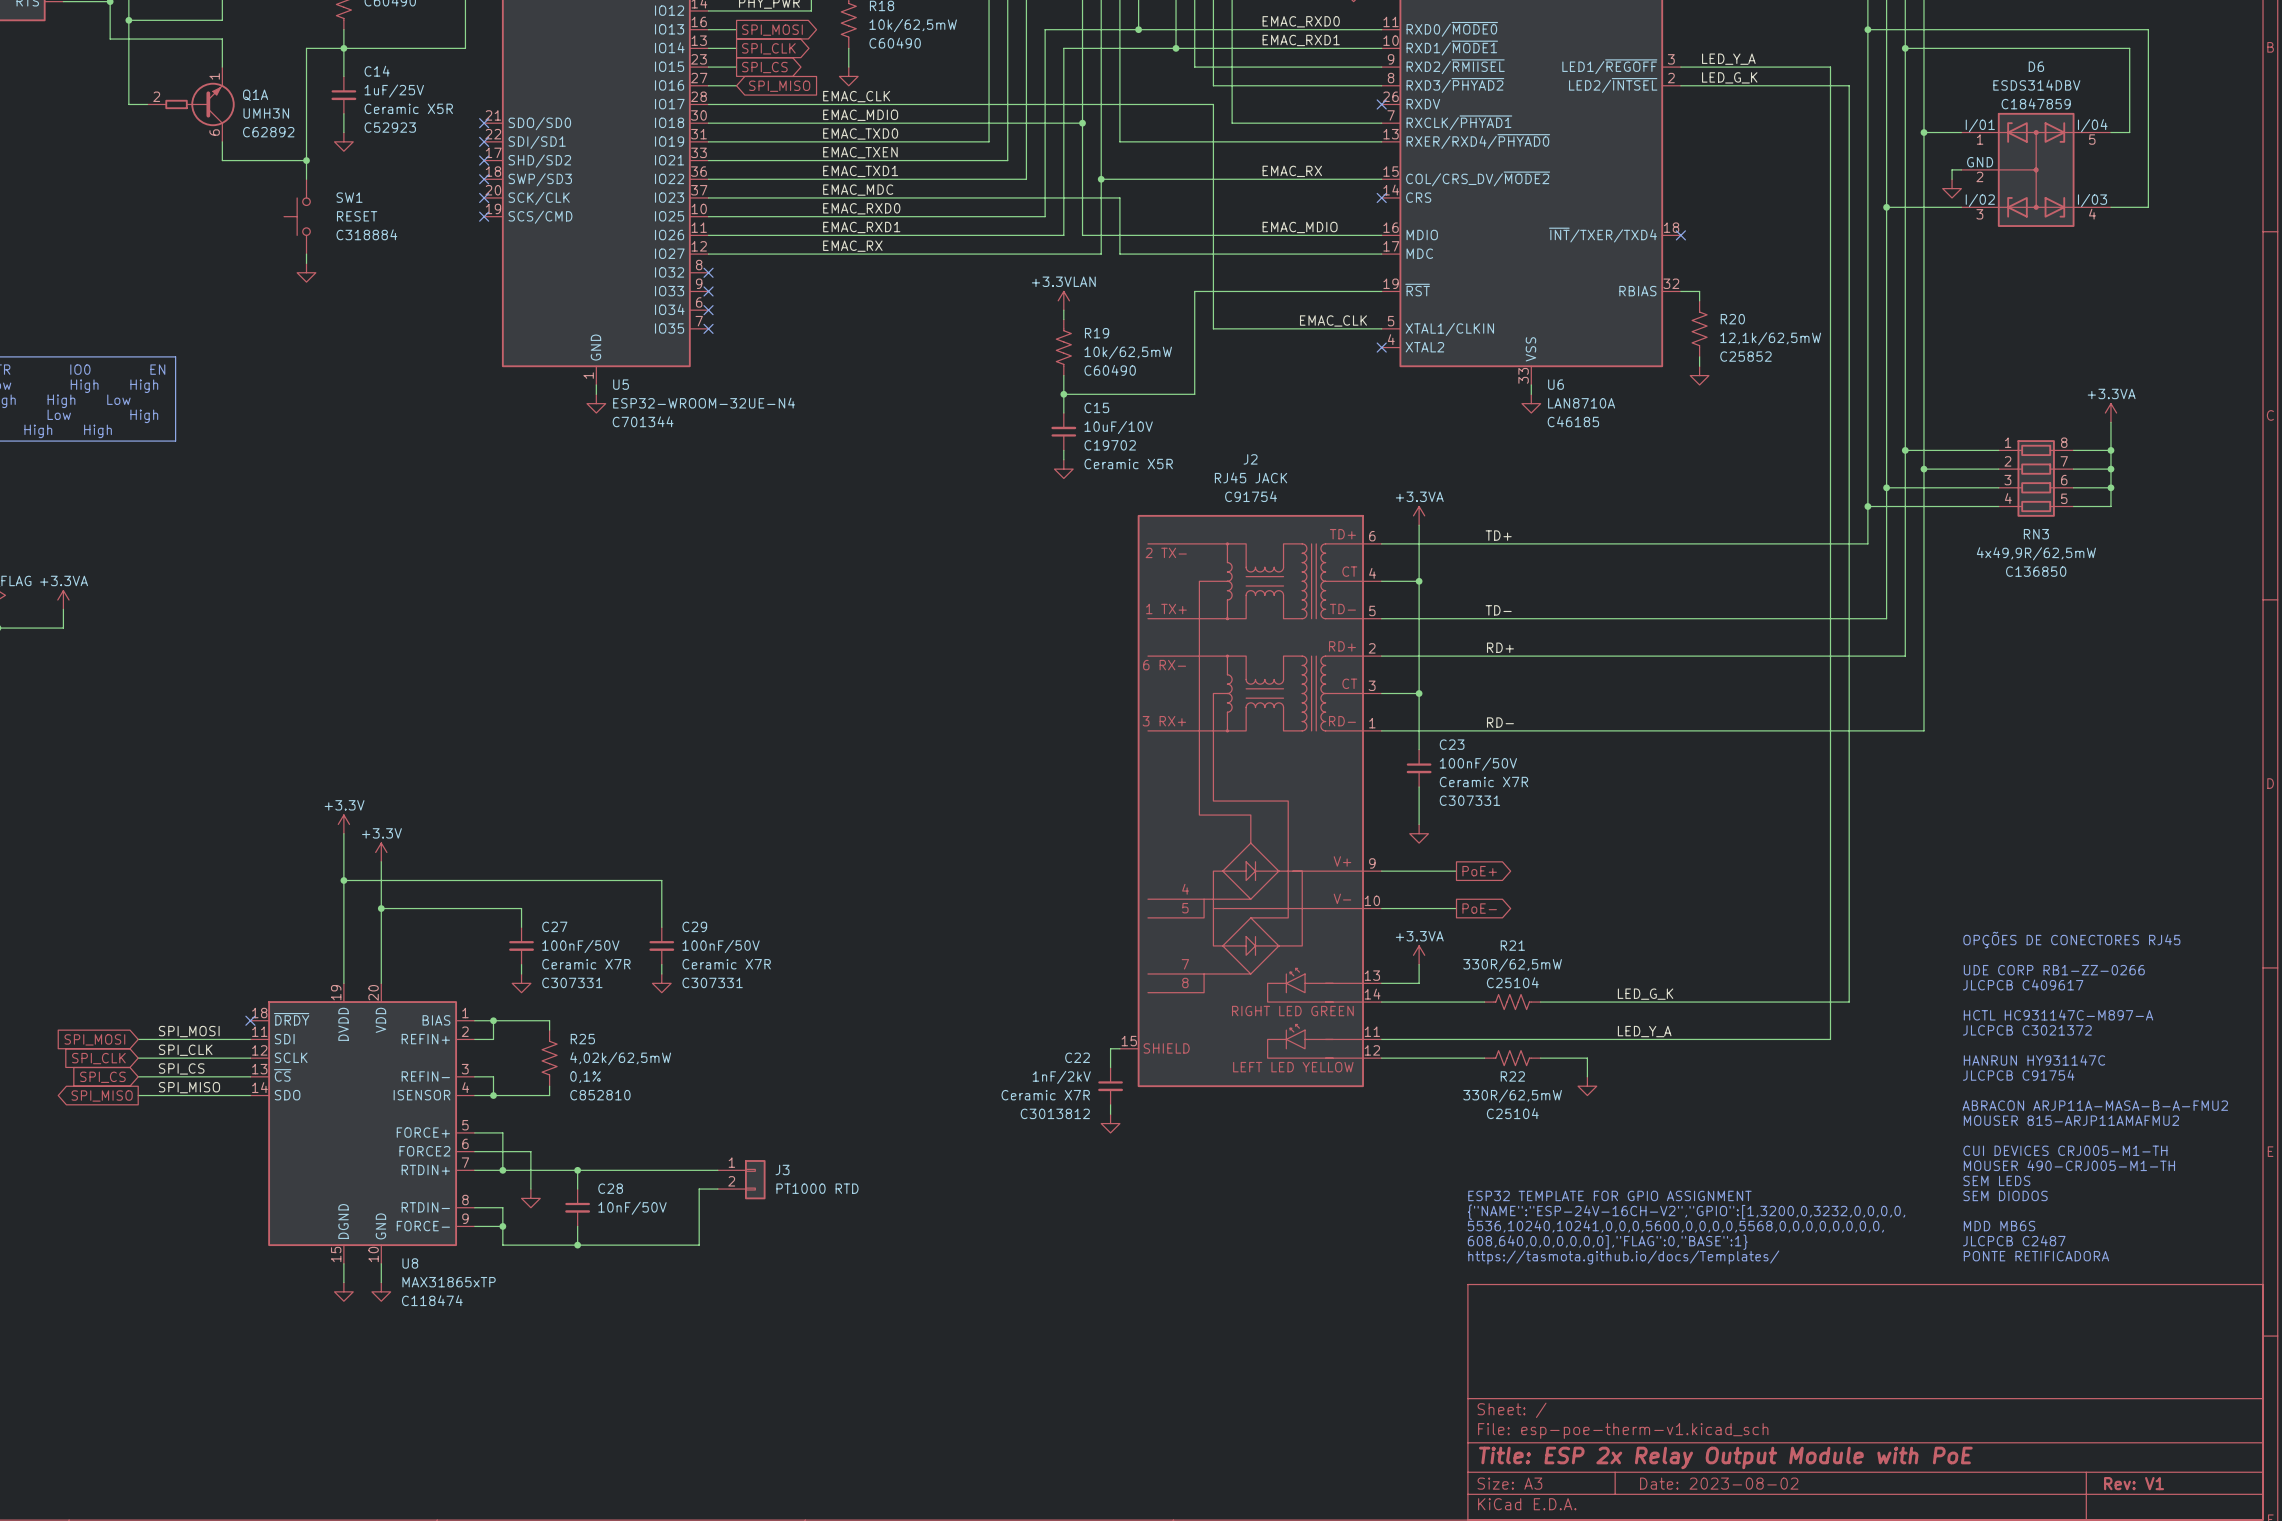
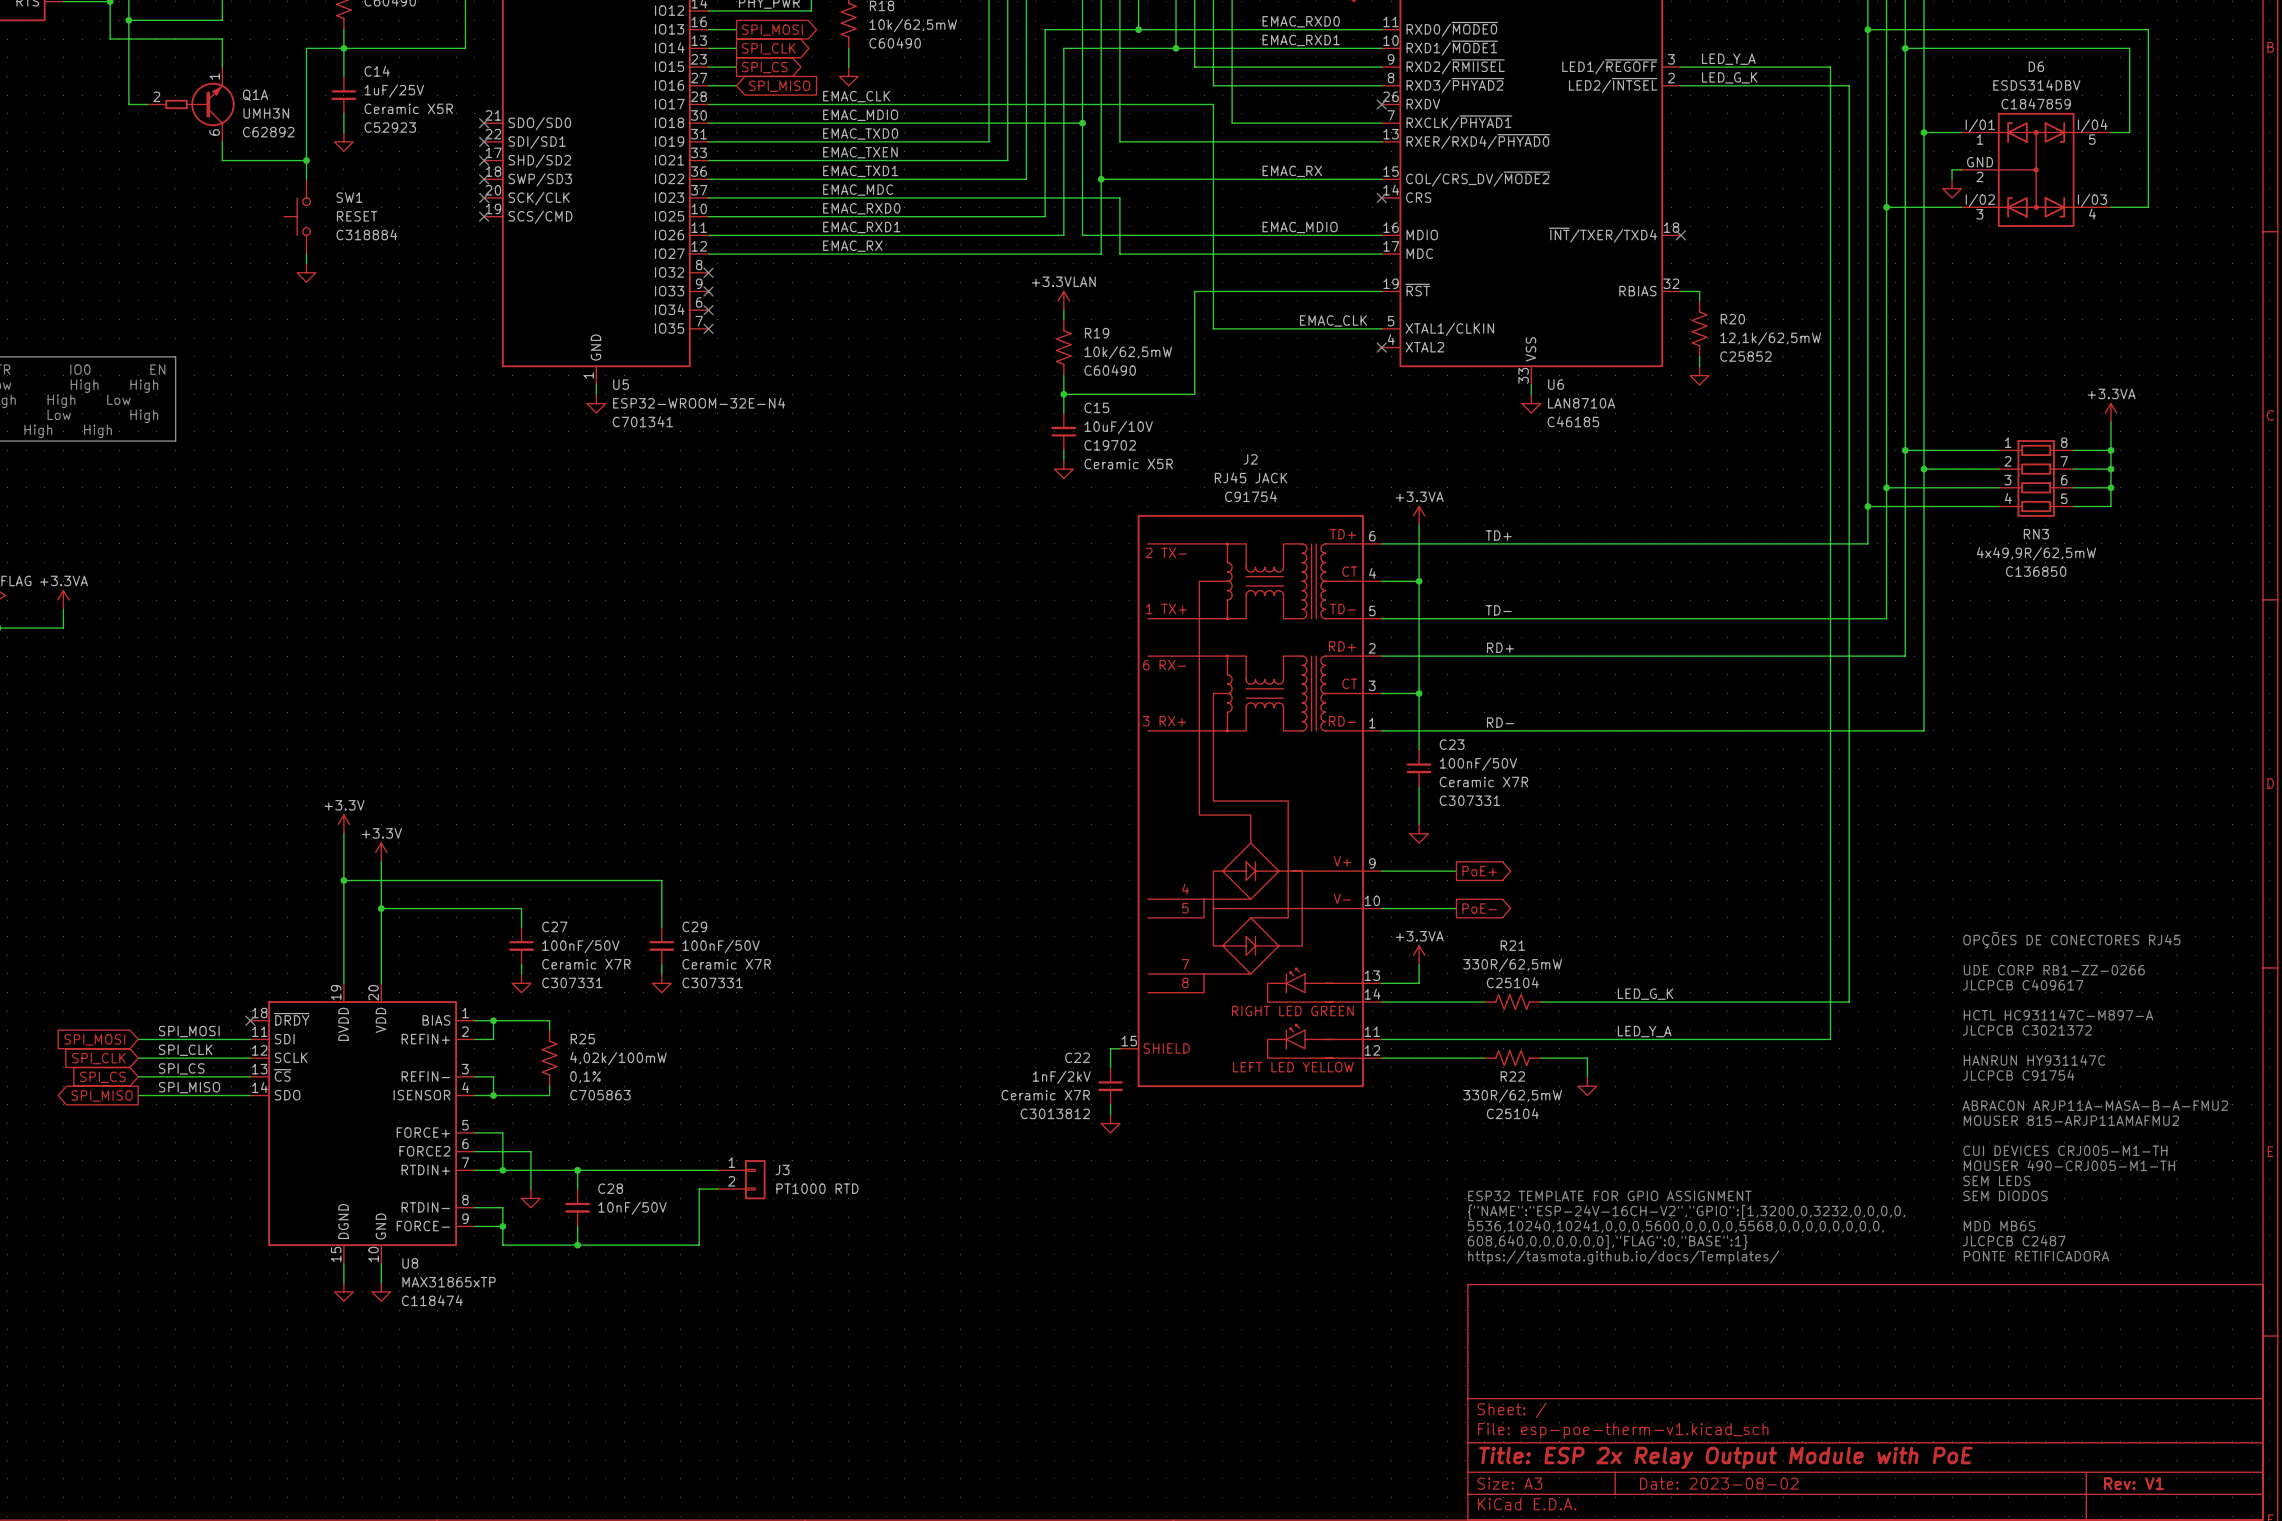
U5 value: ESP32-WROOM-32UE-N4 (704, 403) -> ESP32-WROOM-32E-N4 (699, 403)
U5 text: C701344 (643, 421) -> C701341 (642, 421)
R25 value: 4,02k/62,5mW (620, 1058) -> 4,02k/100mW (618, 1058)
R25 text: C852810 (600, 1095) -> C705863 (600, 1095)

